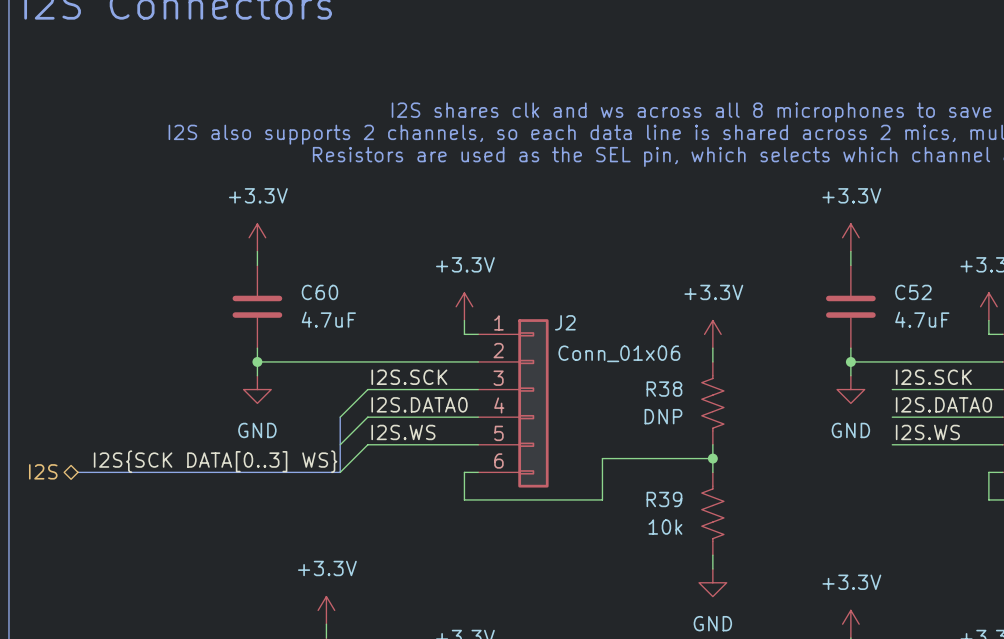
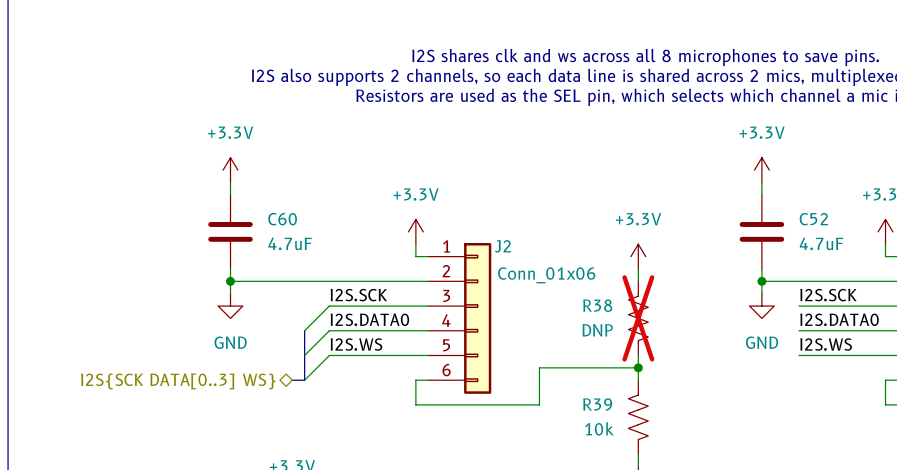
R38 do-not-place cross: none -> (638, 318)
label: I2S{SCK DATA[0..3] WS} (215, 461) -> none
hierarchical label: I2S (43, 471) -> none
bus: (77, 472) (326, 472) -> none
hierarchical label: none -> I2S{SCK DATA[0..3] WS} (178, 381)

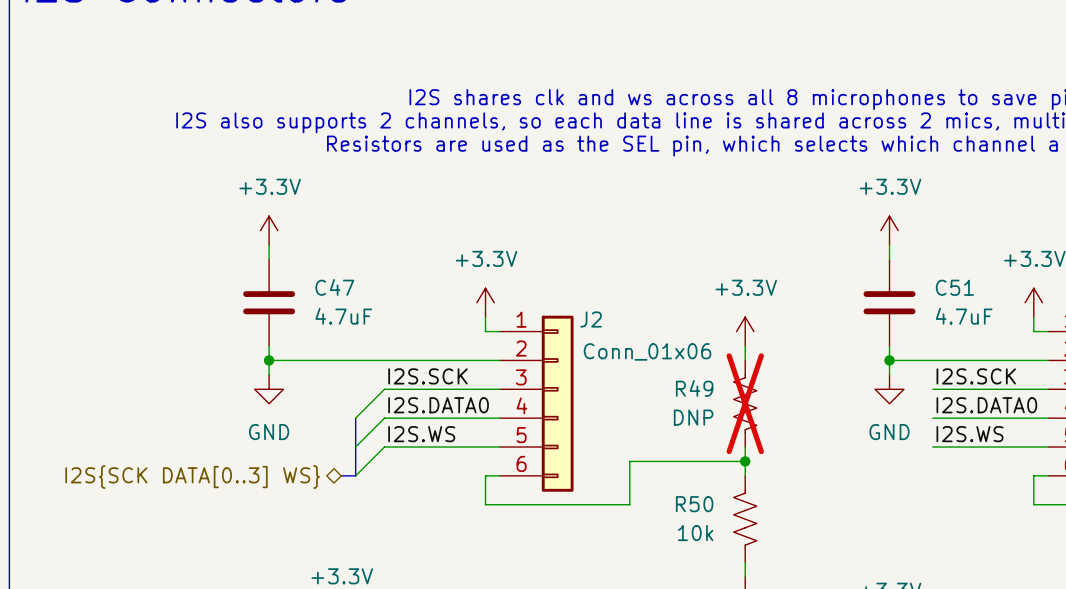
C60 name: C60 (282, 219) -> C47 (334, 287)
C52 name: C52 (813, 219) -> C51 (954, 287)
R38 name: R38 (597, 305) -> R49 (694, 388)
R39 name: R39 (597, 404) -> R50 (694, 504)

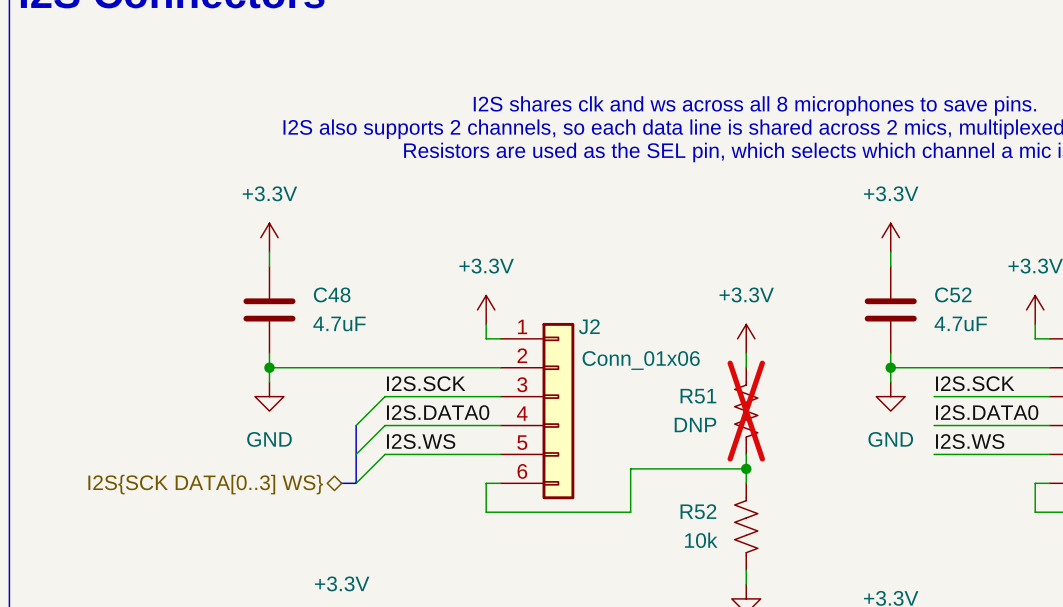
C47 name: C47 (334, 287) -> C48 (332, 294)
C51 name: C51 (954, 287) -> C52 (953, 294)
R49 name: R49 (694, 388) -> R51 (698, 396)
R50 name: R50 (694, 504) -> R52 (698, 511)

